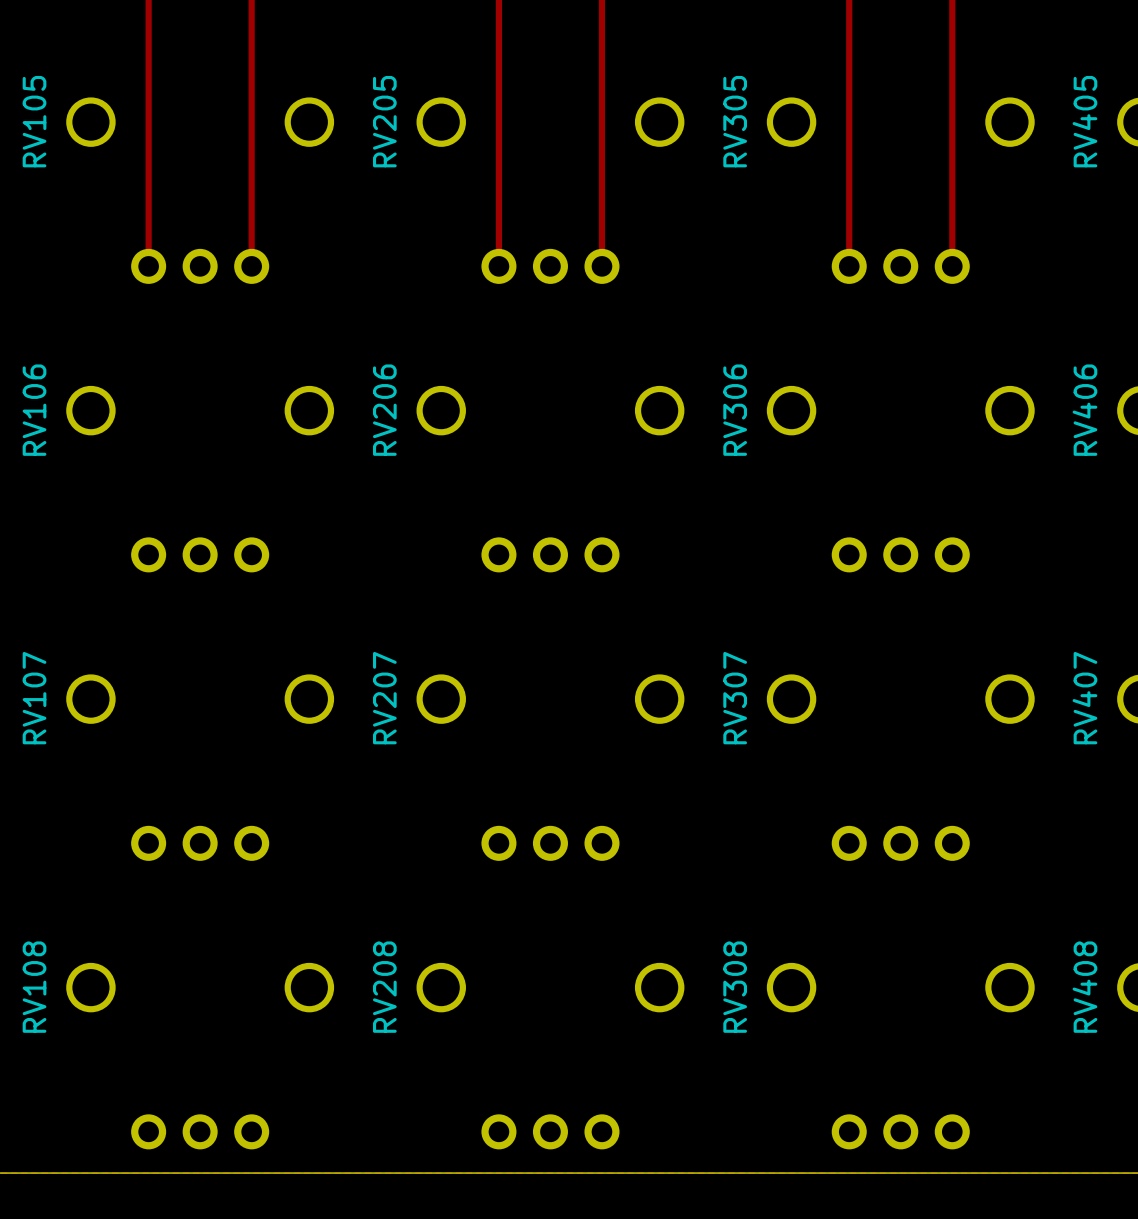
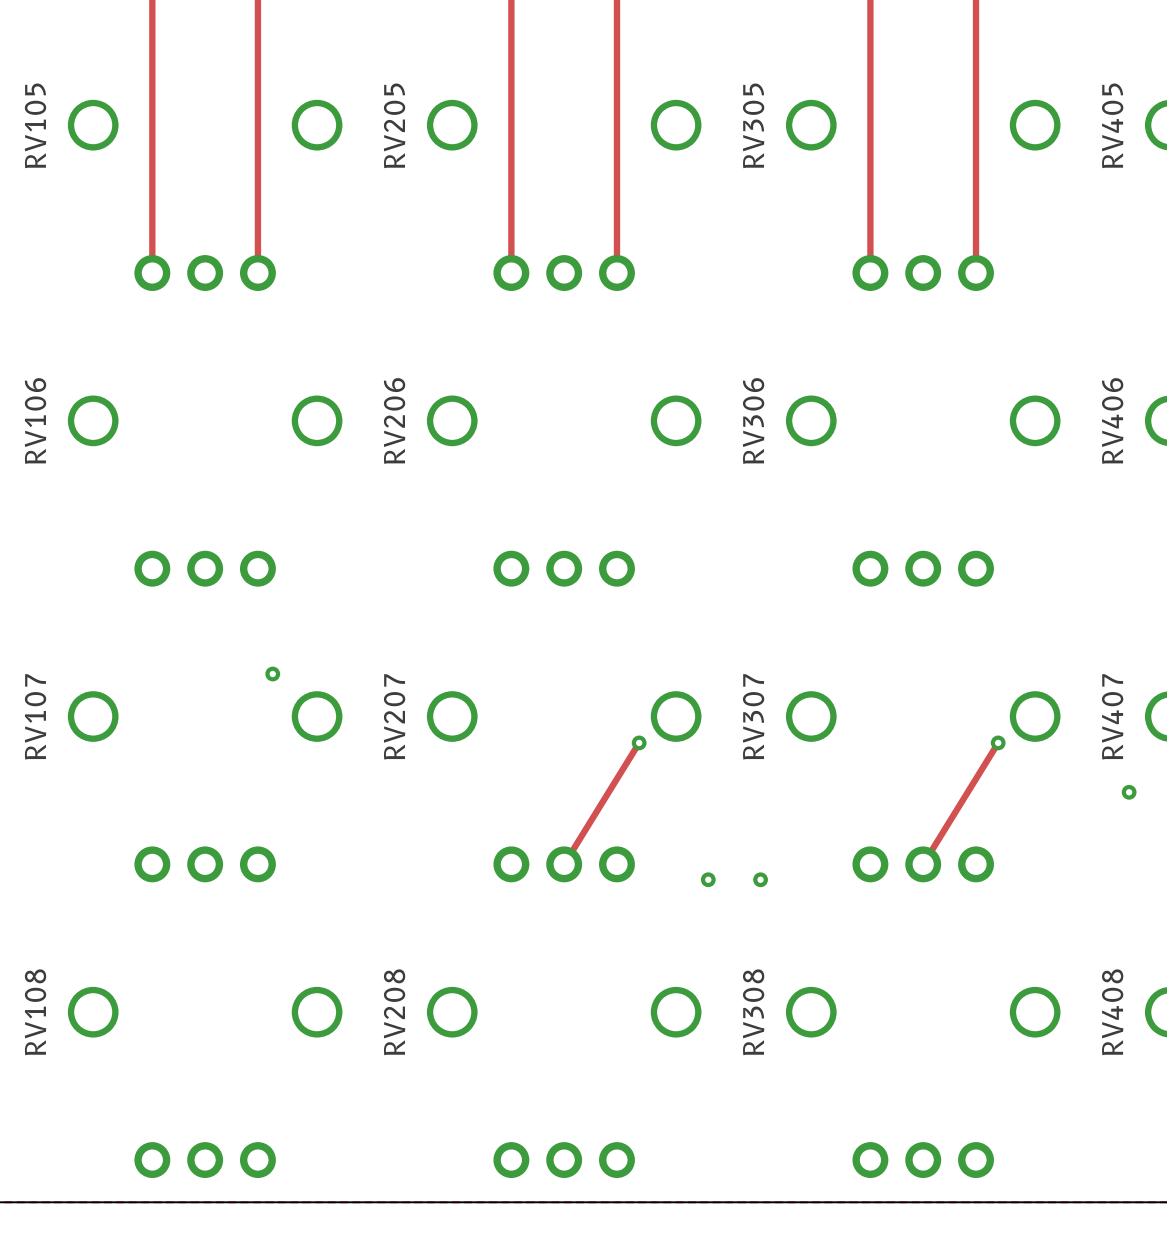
via: none -> (272, 674)
track: none -> (639, 742) (564, 864)
via: none -> (639, 742)
track: none -> (998, 742) (923, 864)
via: none -> (998, 742)
via: none -> (1129, 792)
via: none -> (708, 879)
via: none -> (760, 879)

